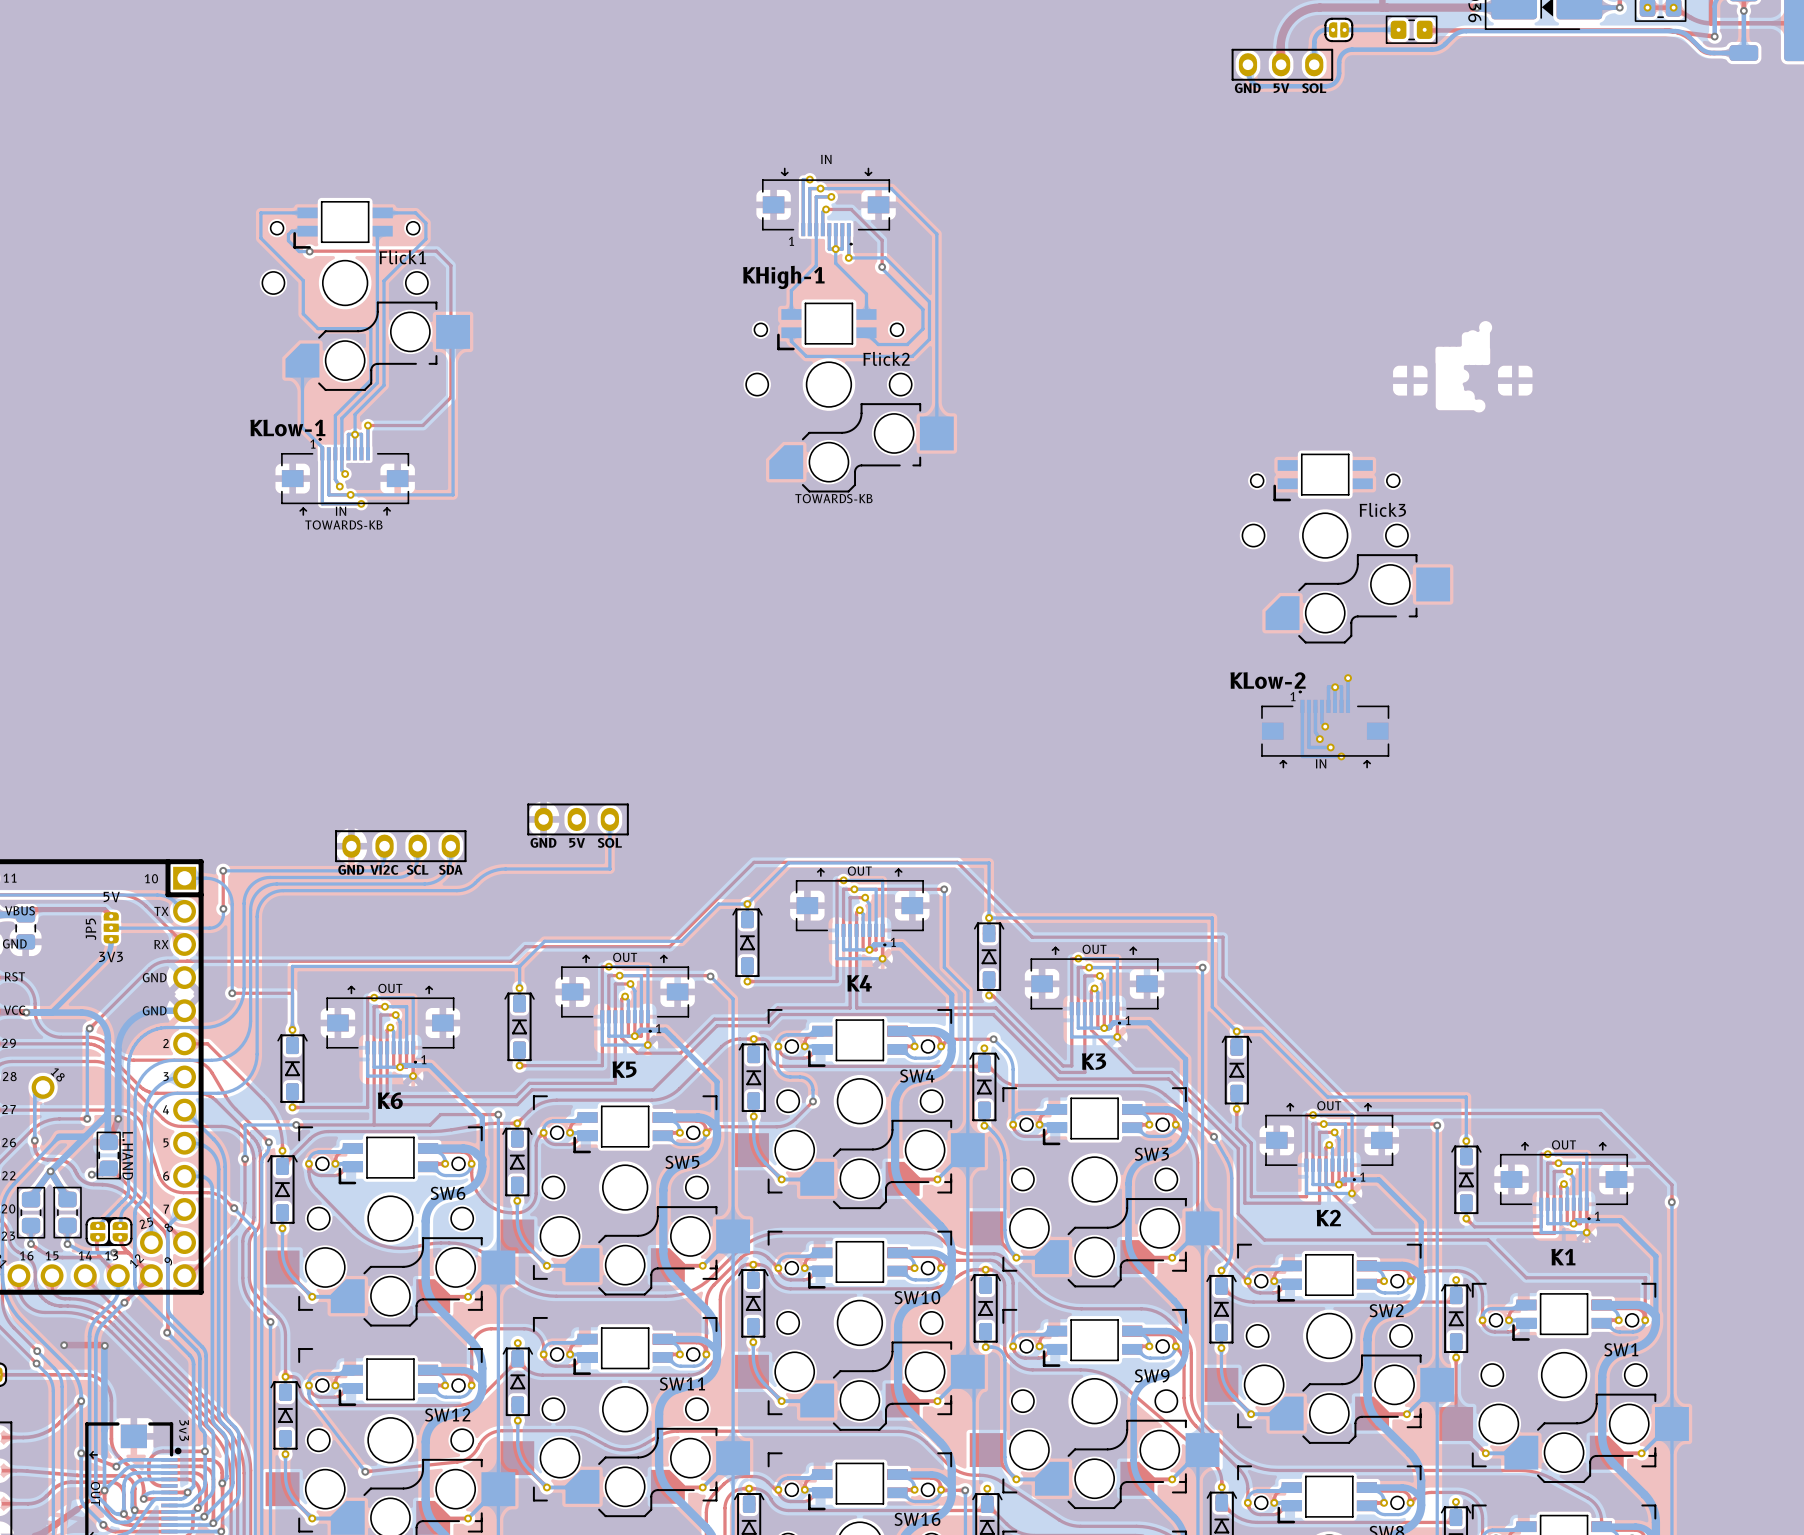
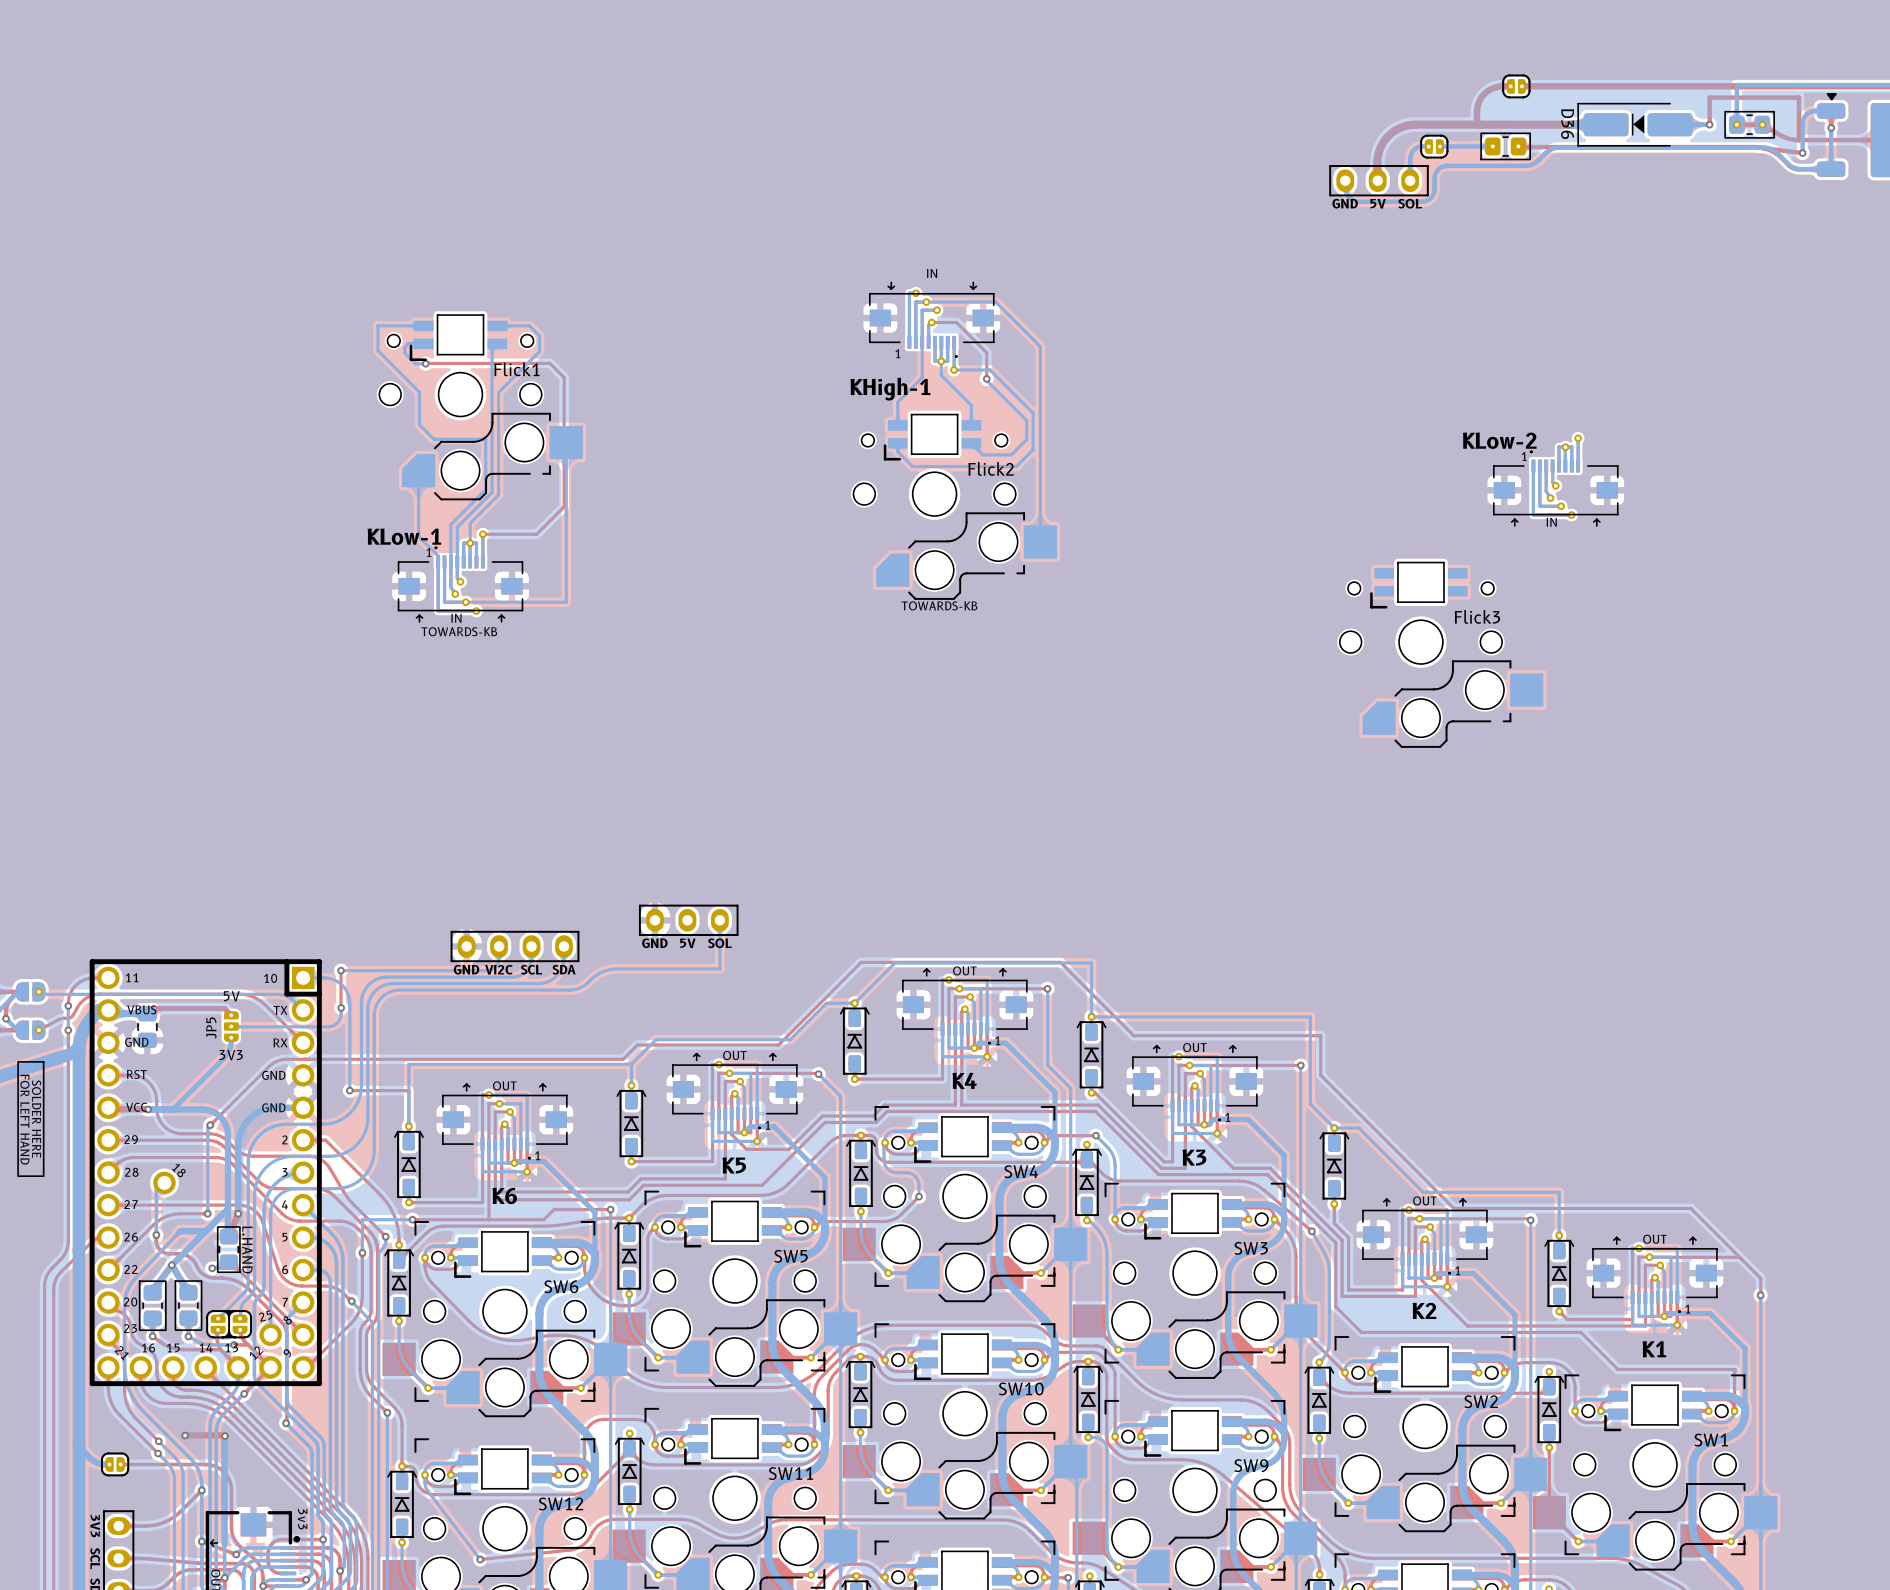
KLow-2 position: (1325, 721) -> (1555, 480)

